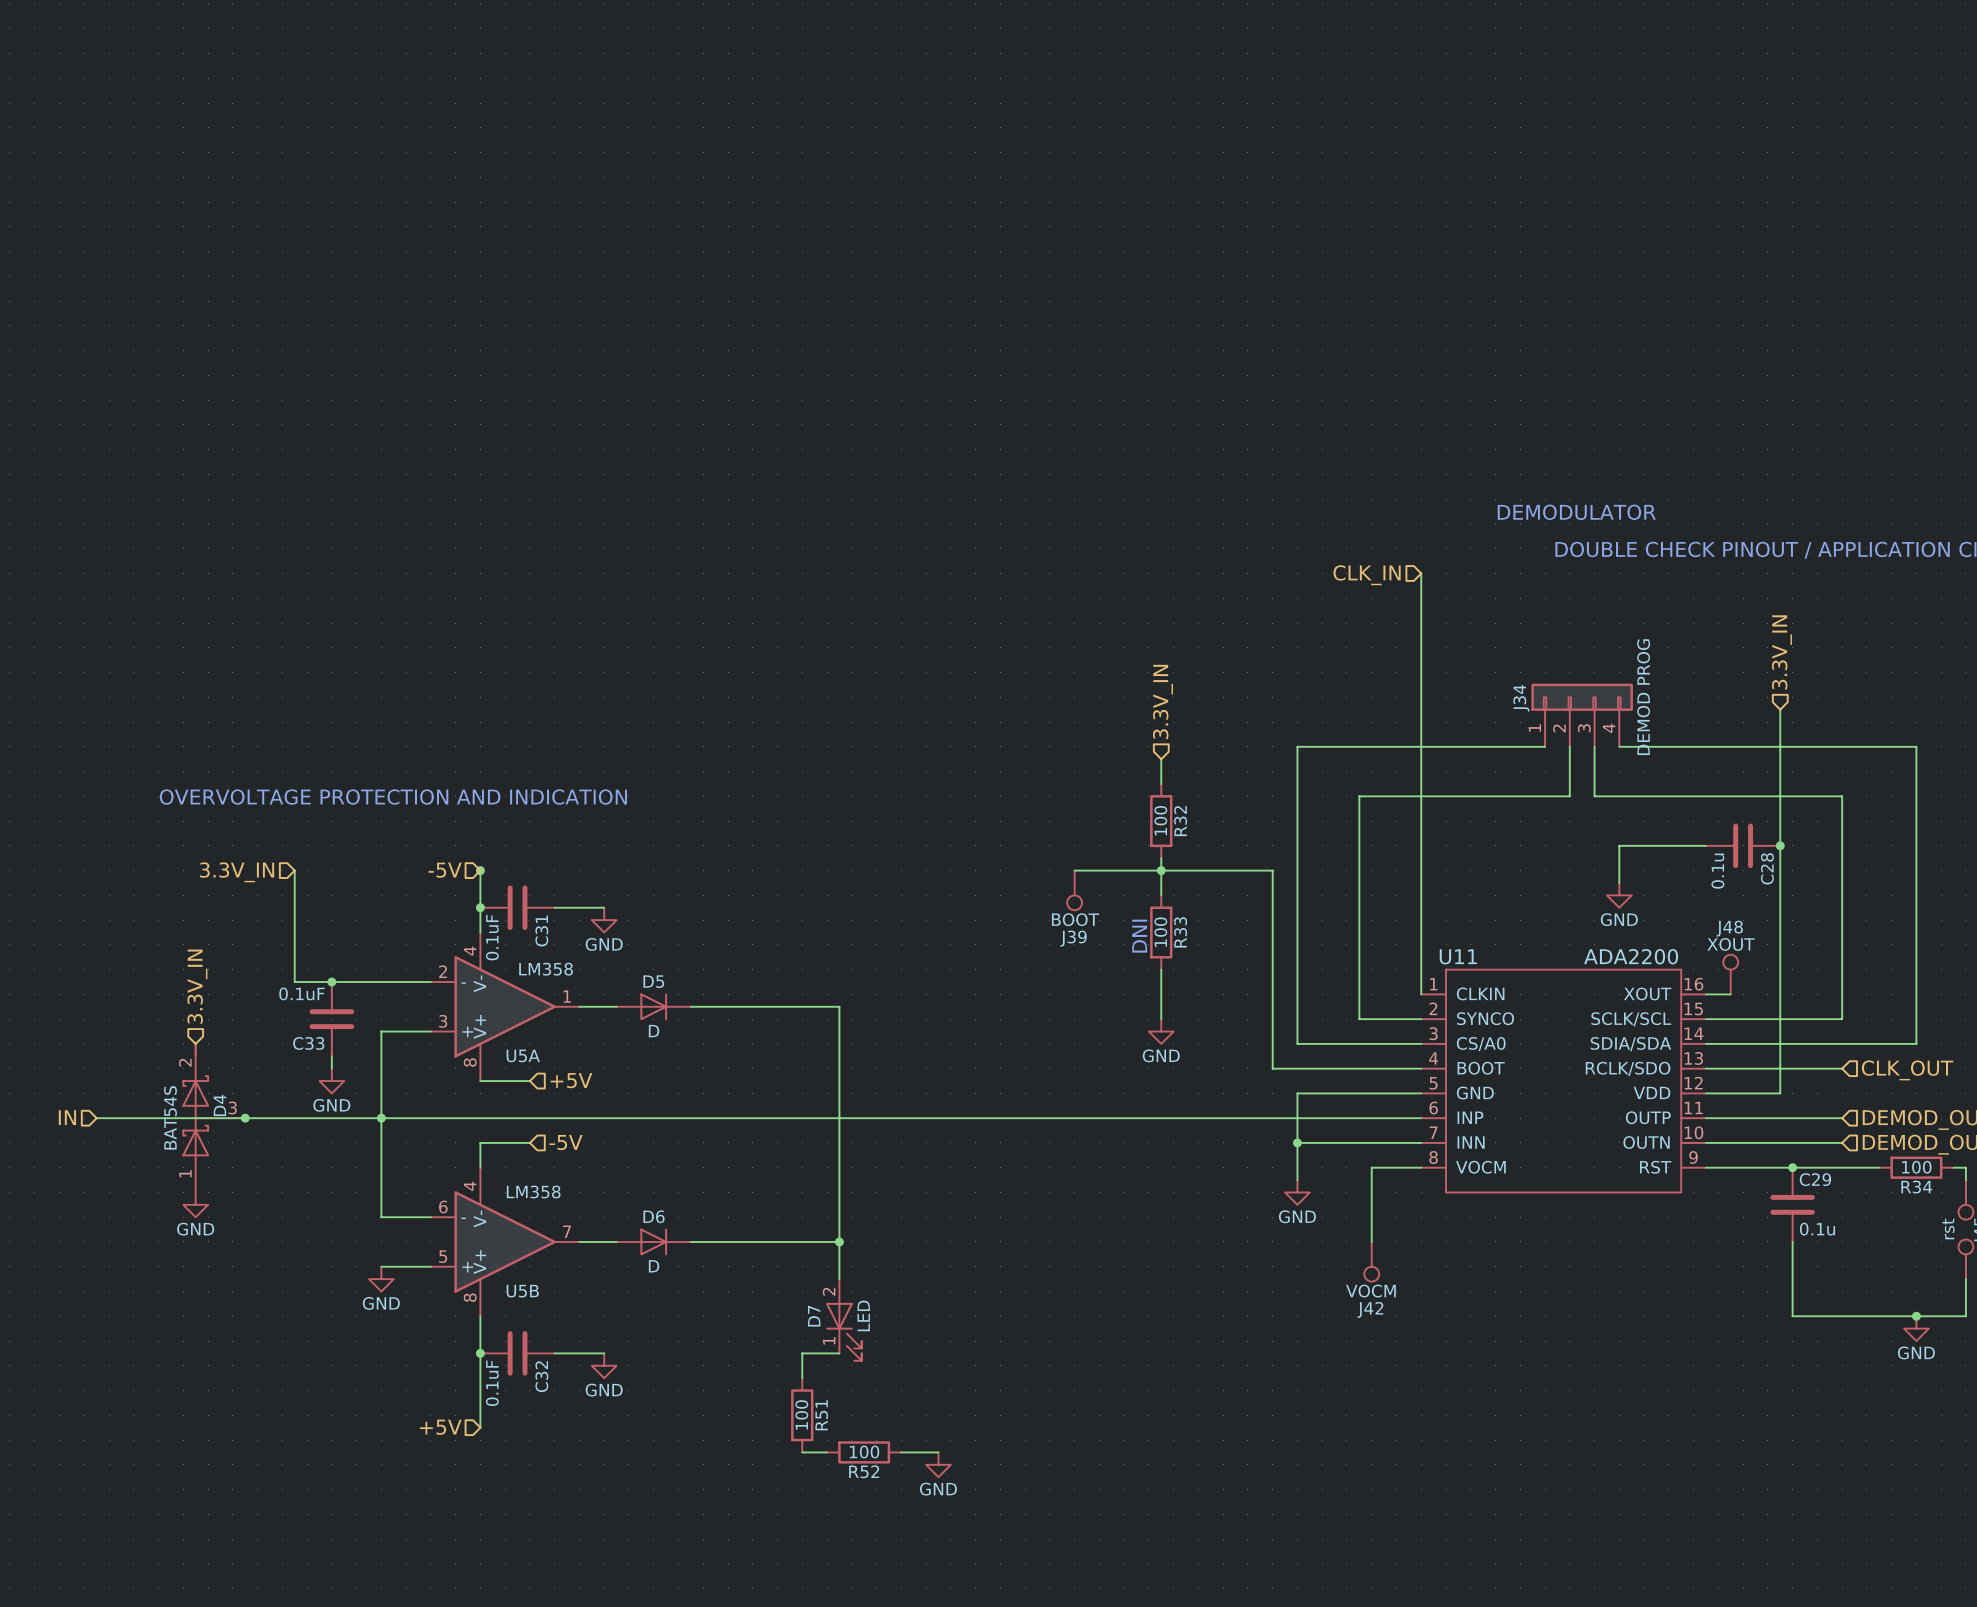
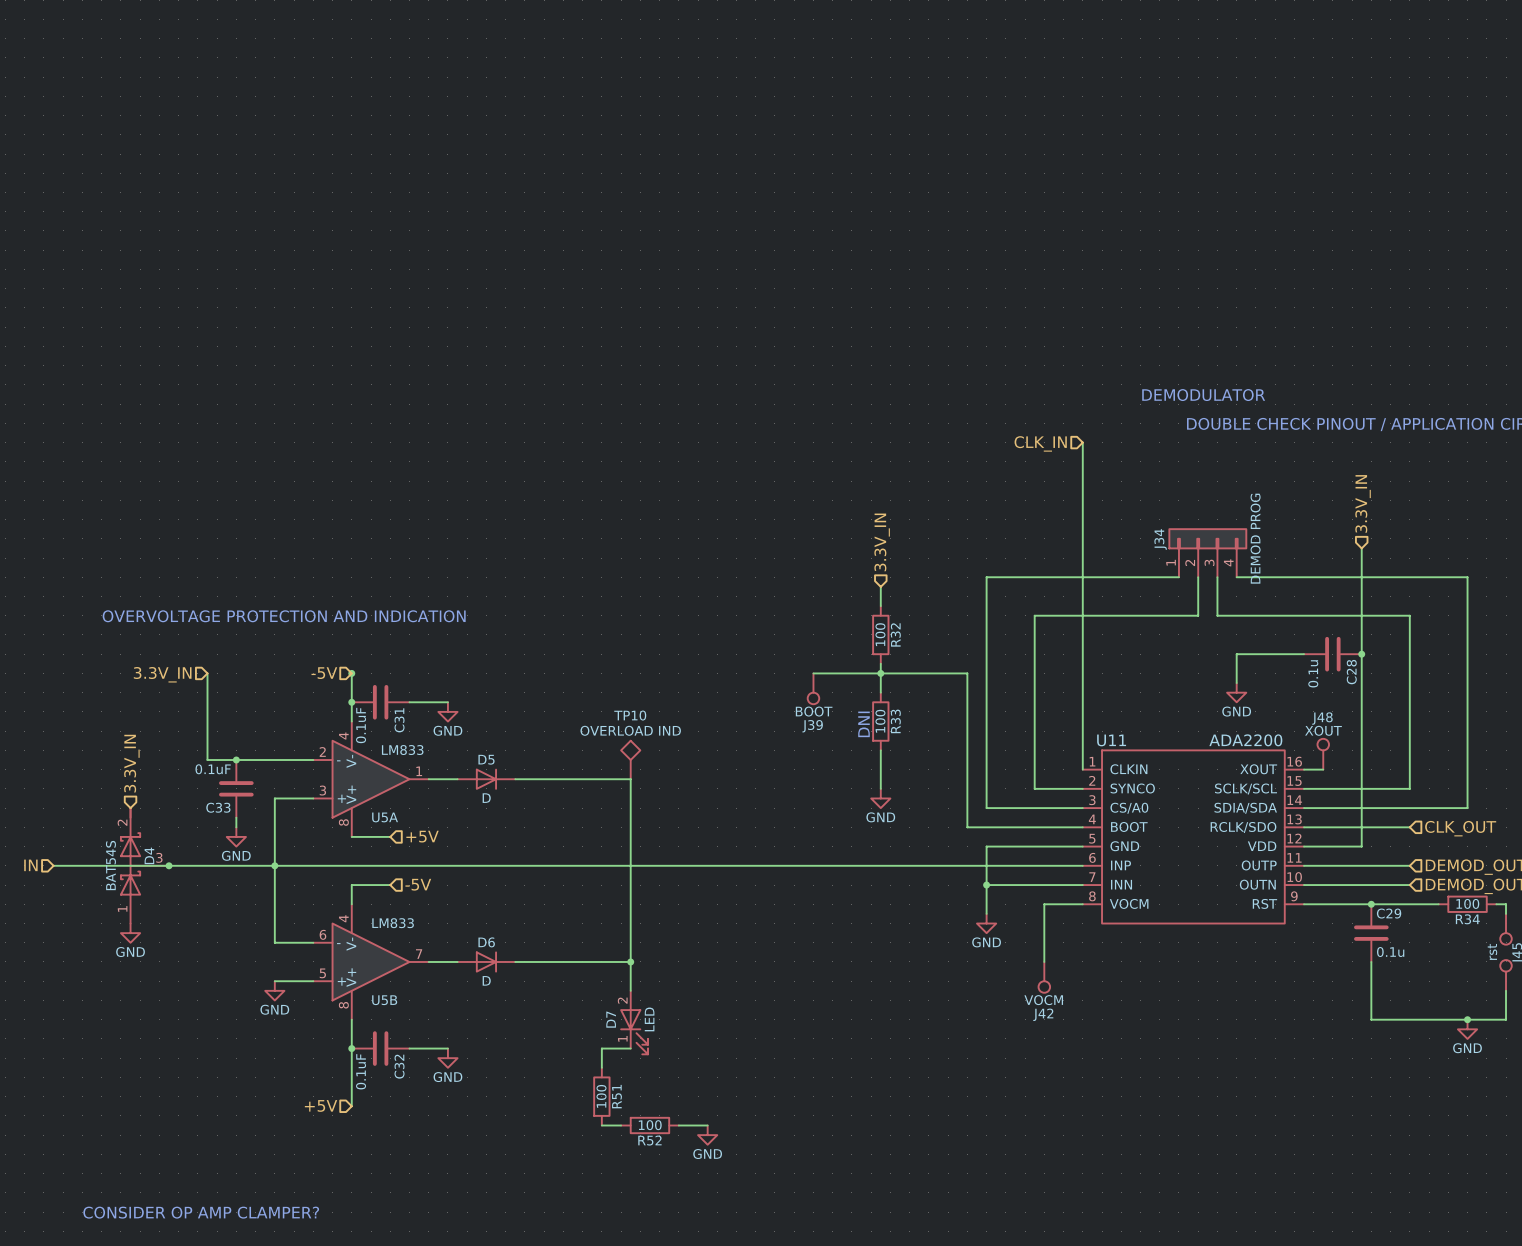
U5A value: LM358 (546, 969) -> LM833 (402, 750)
TP10: none -> OVERLOAD IND (630, 760)
U5B value: LM358 (533, 1192) -> LM833 (393, 923)
text: none -> CONSIDER OP AMP CLAMPER? (201, 1212)

